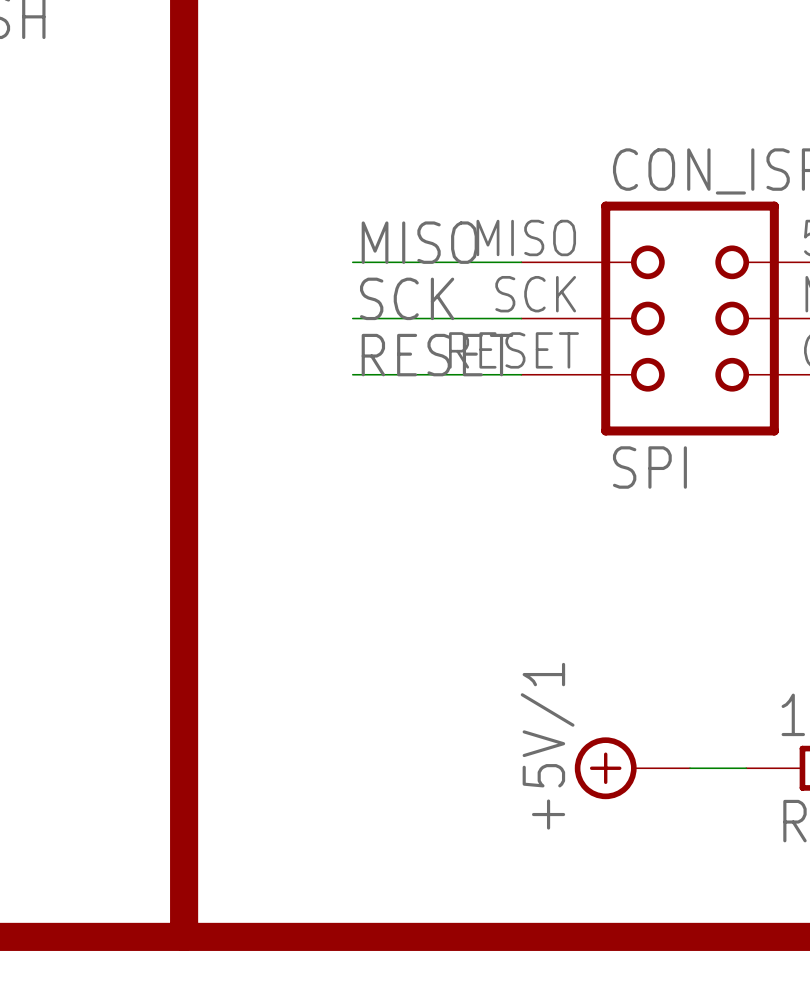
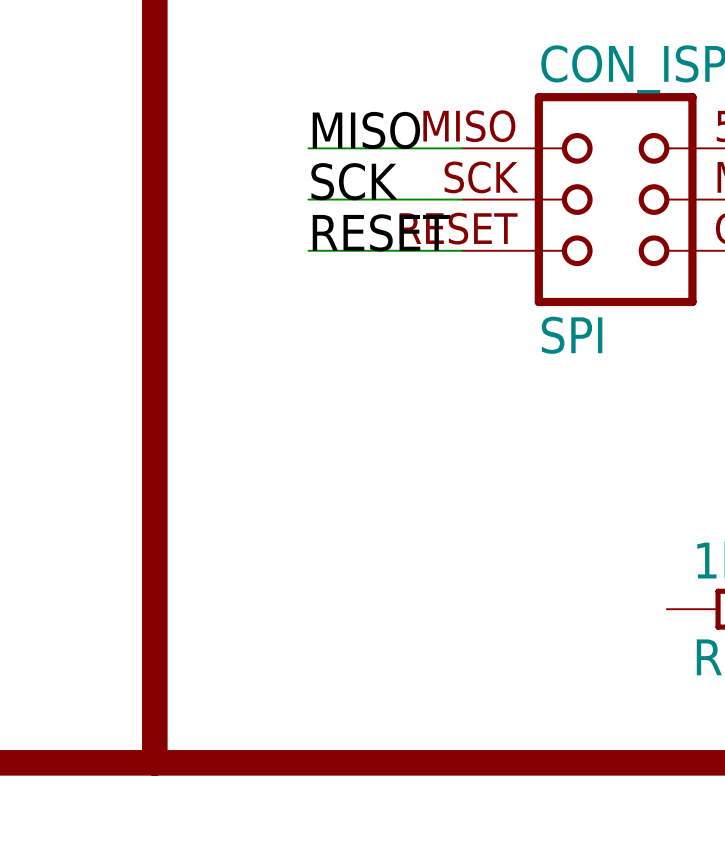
power symbol: +5V/1 (632, 768) -> none
wire: (690, 768) (746, 768) -> none

